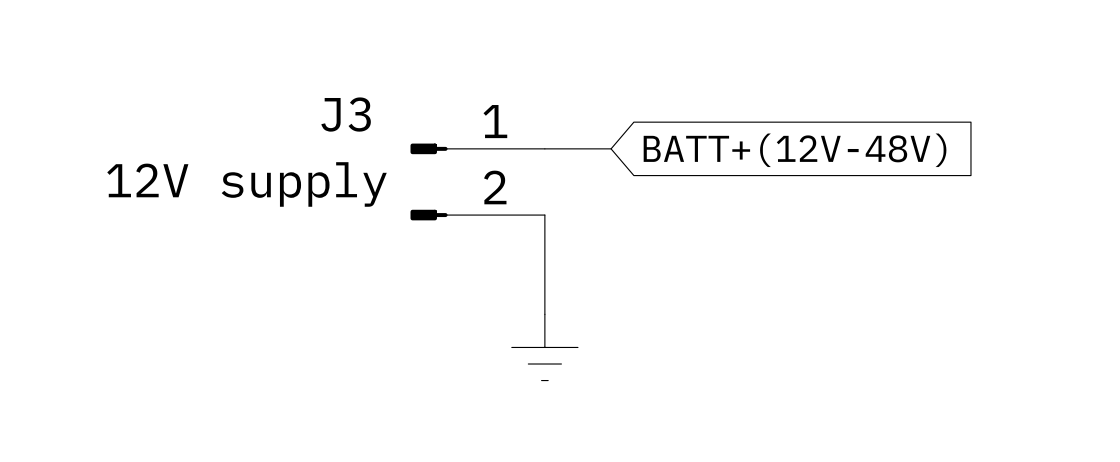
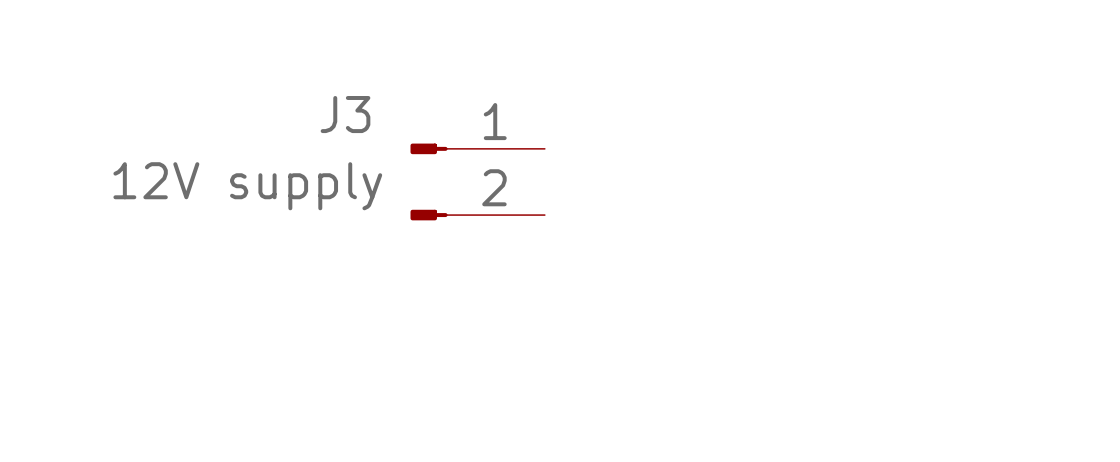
wire: (544, 148) (611, 148) -> none
global label: BATT+(12V-48V) (795, 150) -> none
wire: (544, 215) (544, 314) -> none
power symbol: (544, 347) -> none

